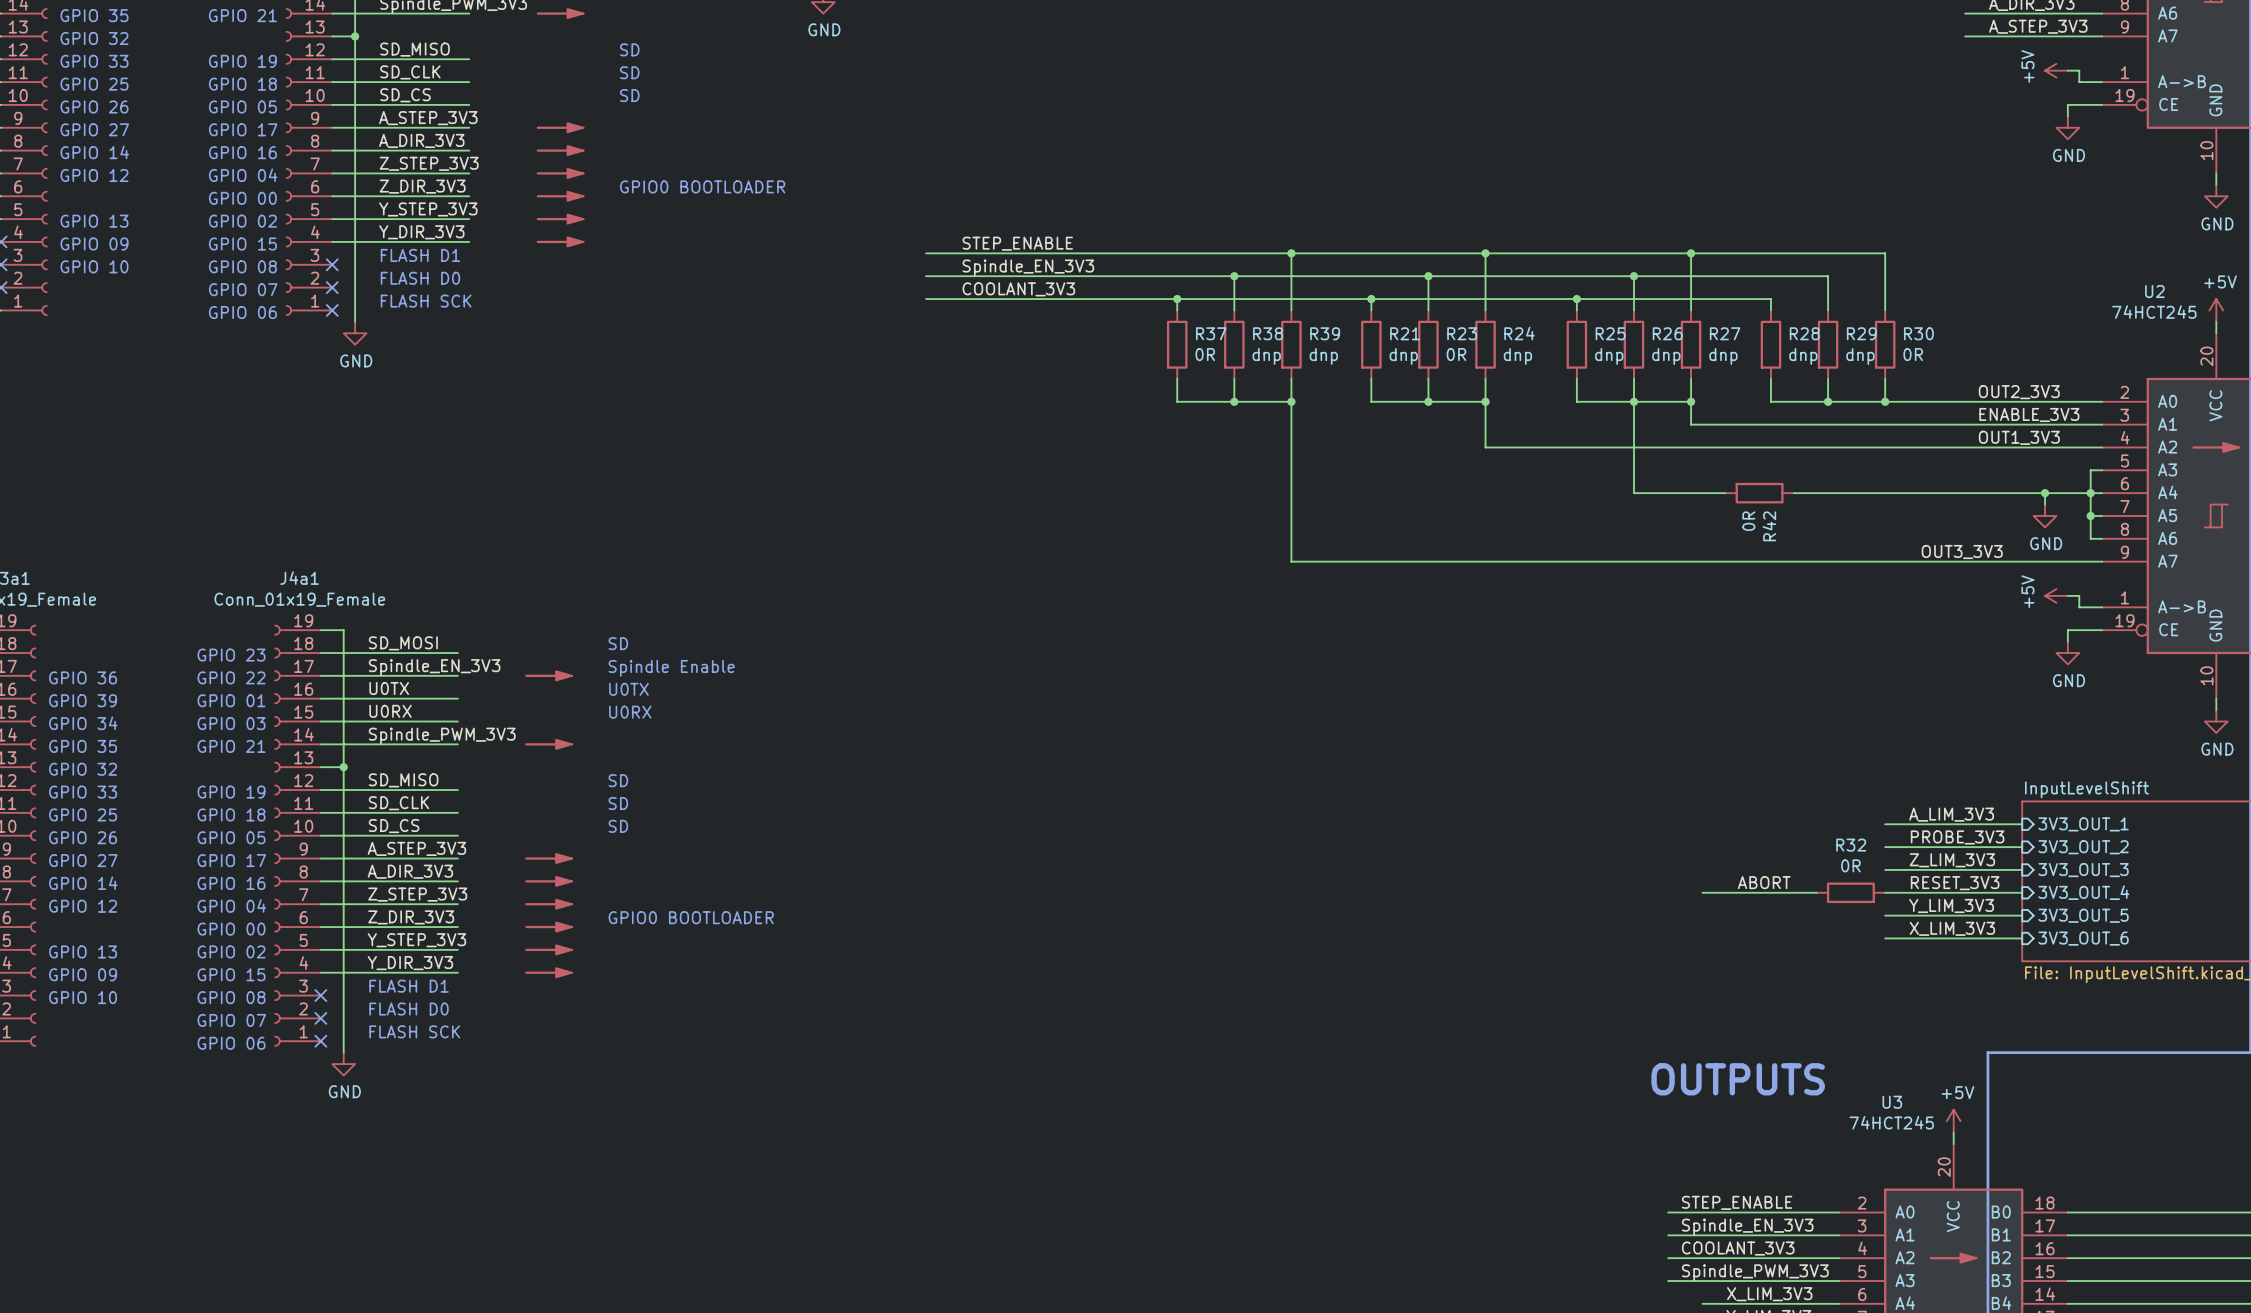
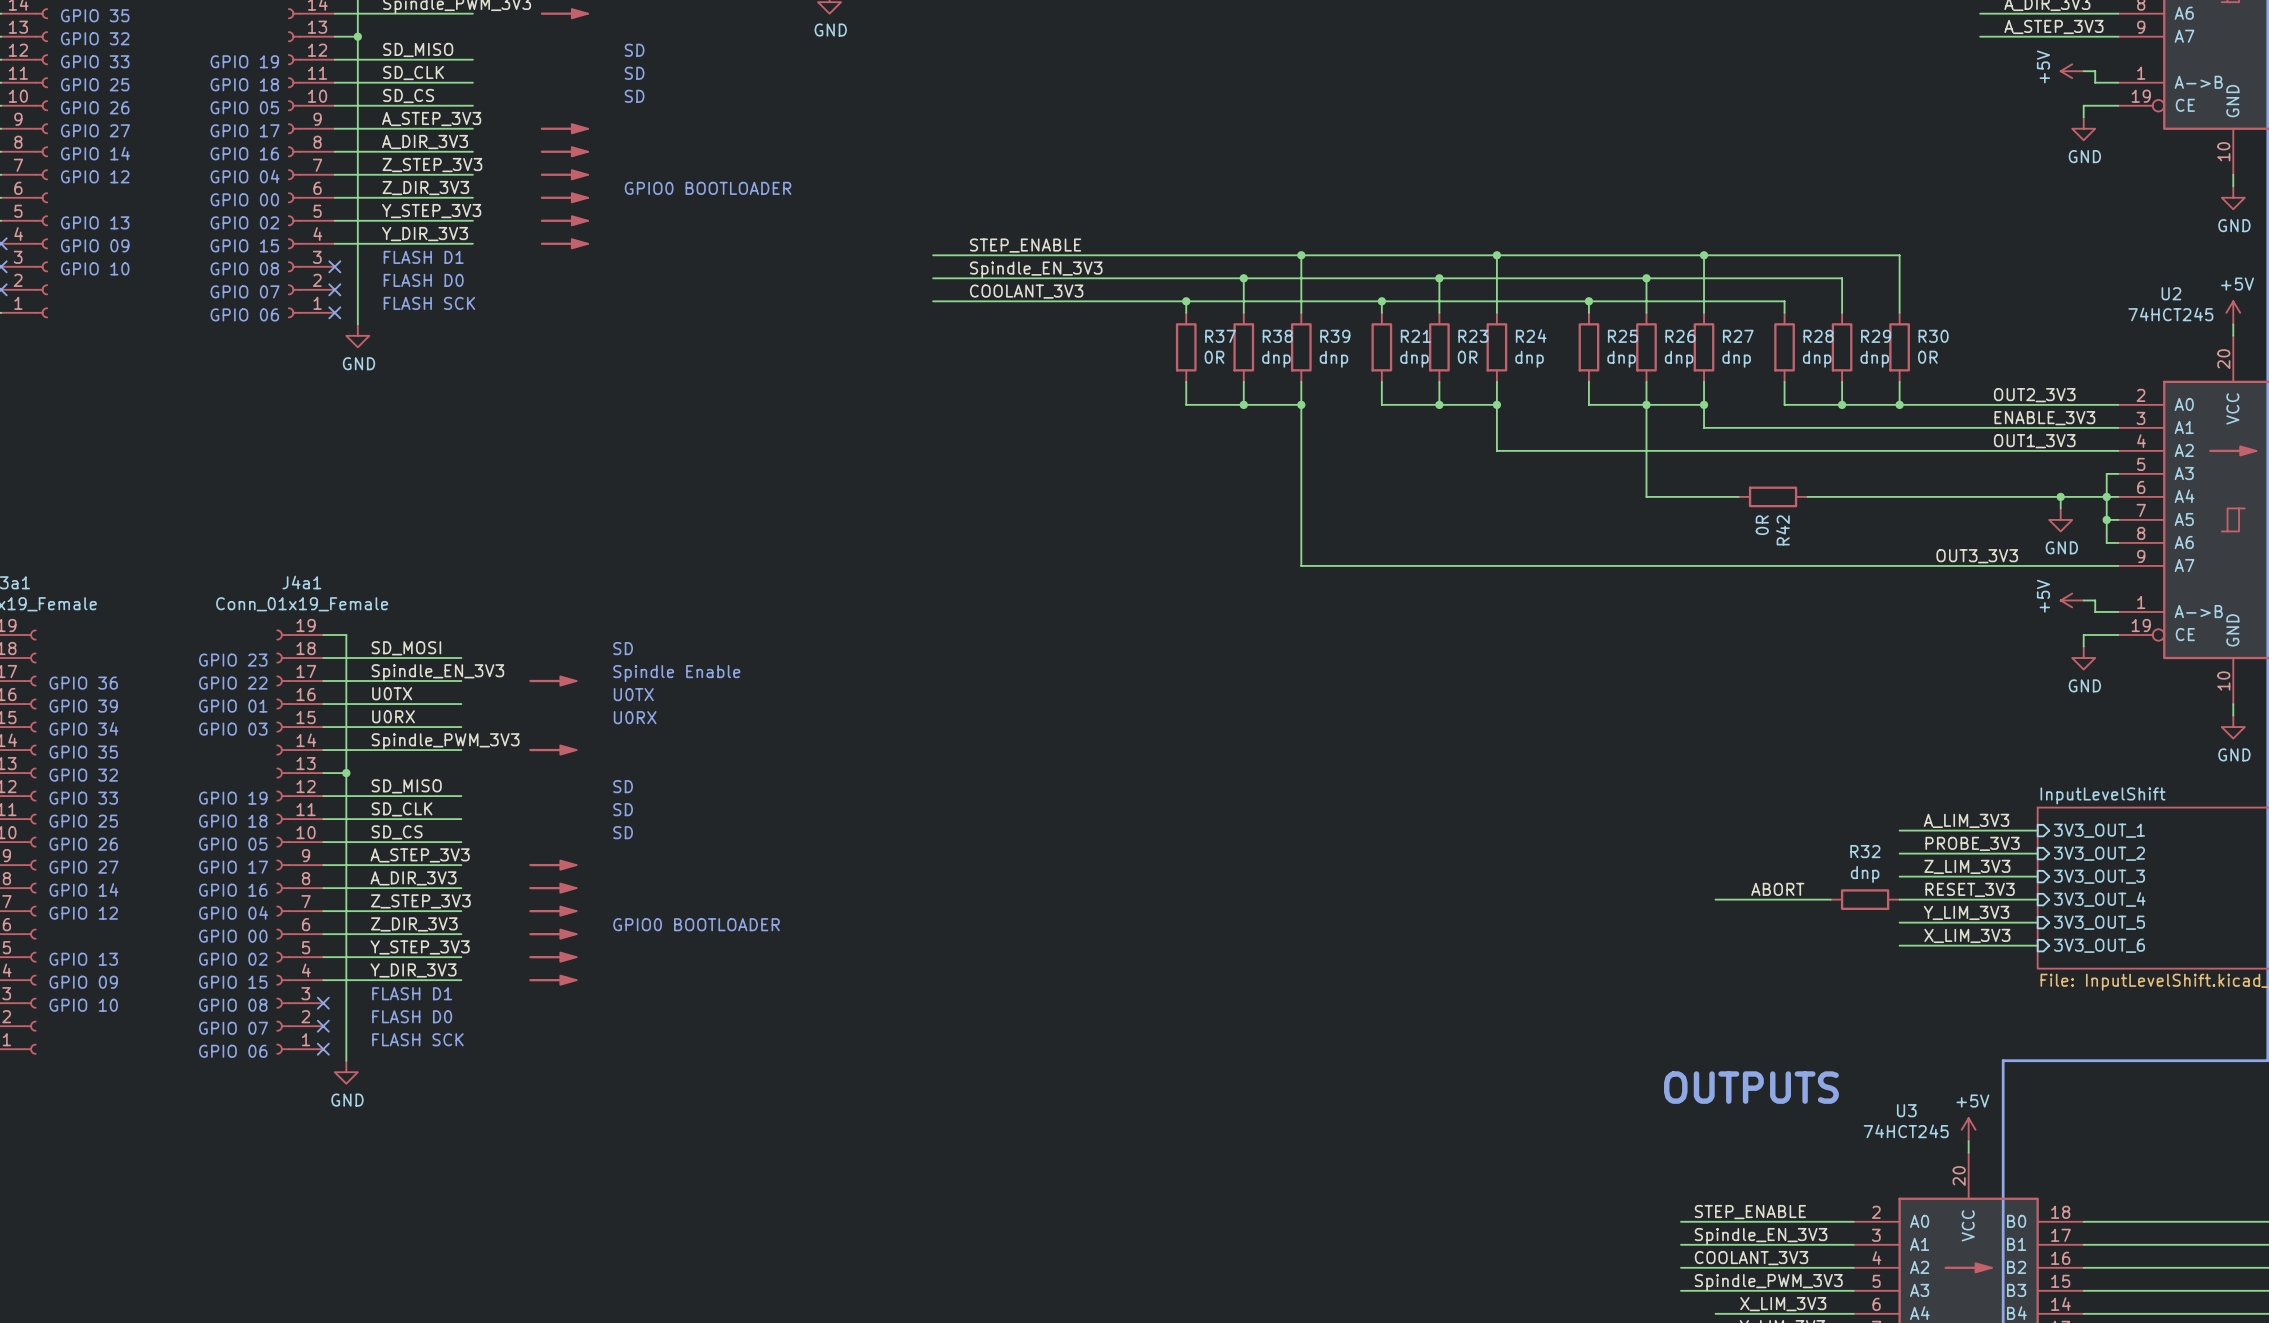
text: GPIO 21 (242, 15) -> none
text: GPIO 21 (231, 746) -> none
R32 value: 0R (1850, 865) -> dnp (1865, 874)

